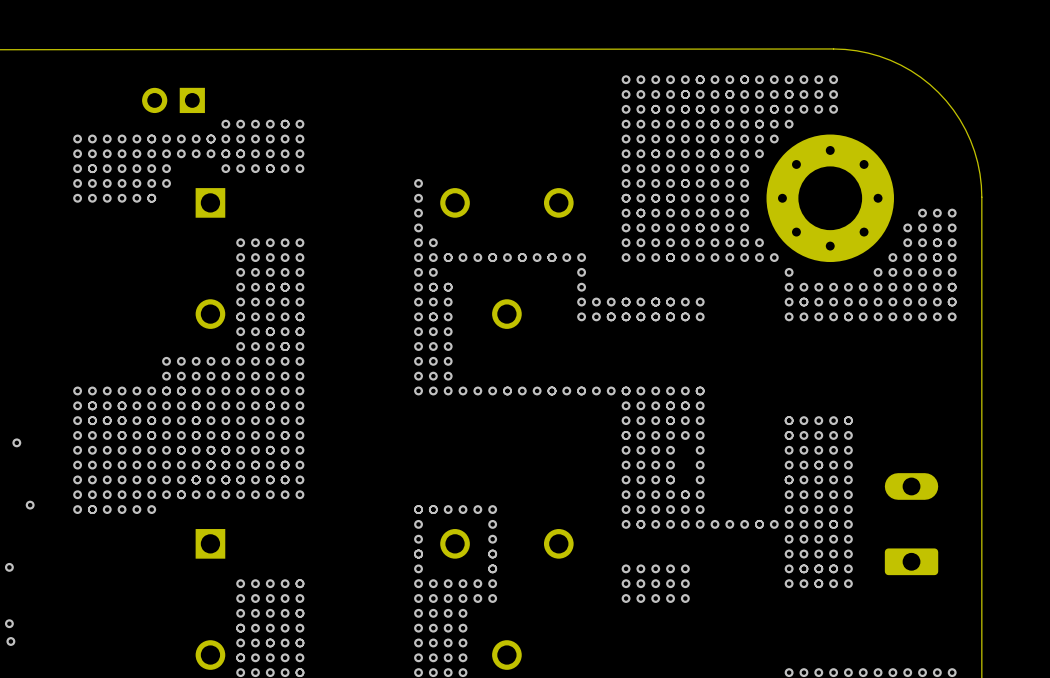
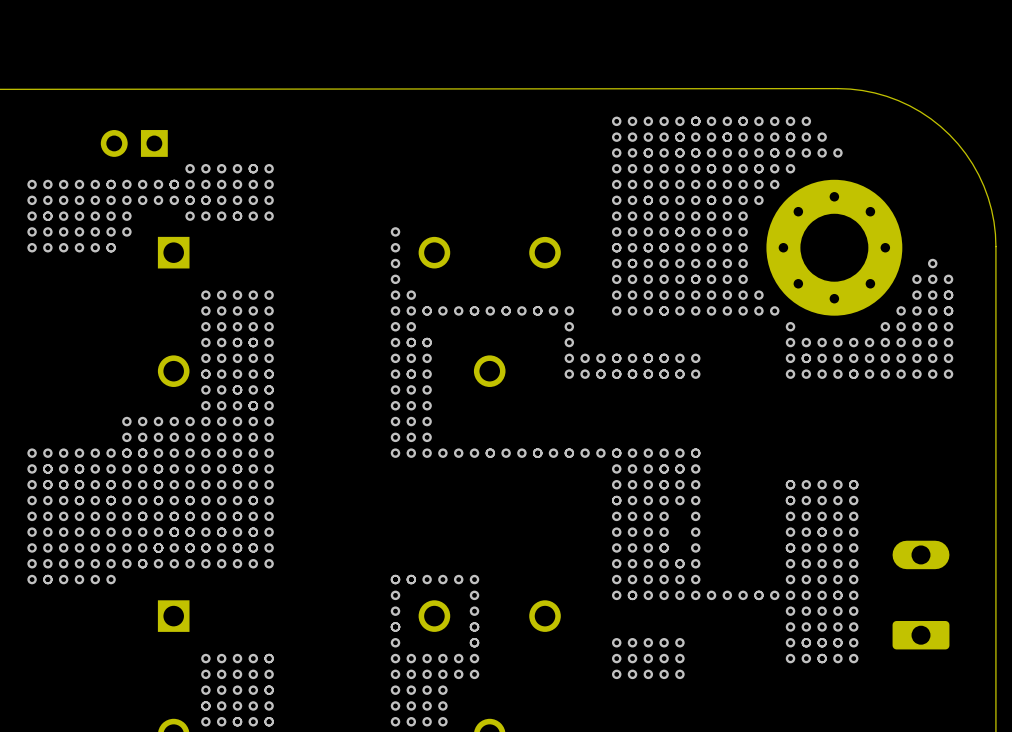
via: (818, 79) -> none
via: (833, 79) -> none
via: (833, 94) -> none
via: (937, 213) -> none
via: (952, 213) -> none
via: (952, 227) -> none
via: (952, 242) -> none
via: (952, 257) -> none
via: (952, 272) -> none
via: (952, 287) -> none
via: (952, 302) -> none
via: (952, 316) -> none

